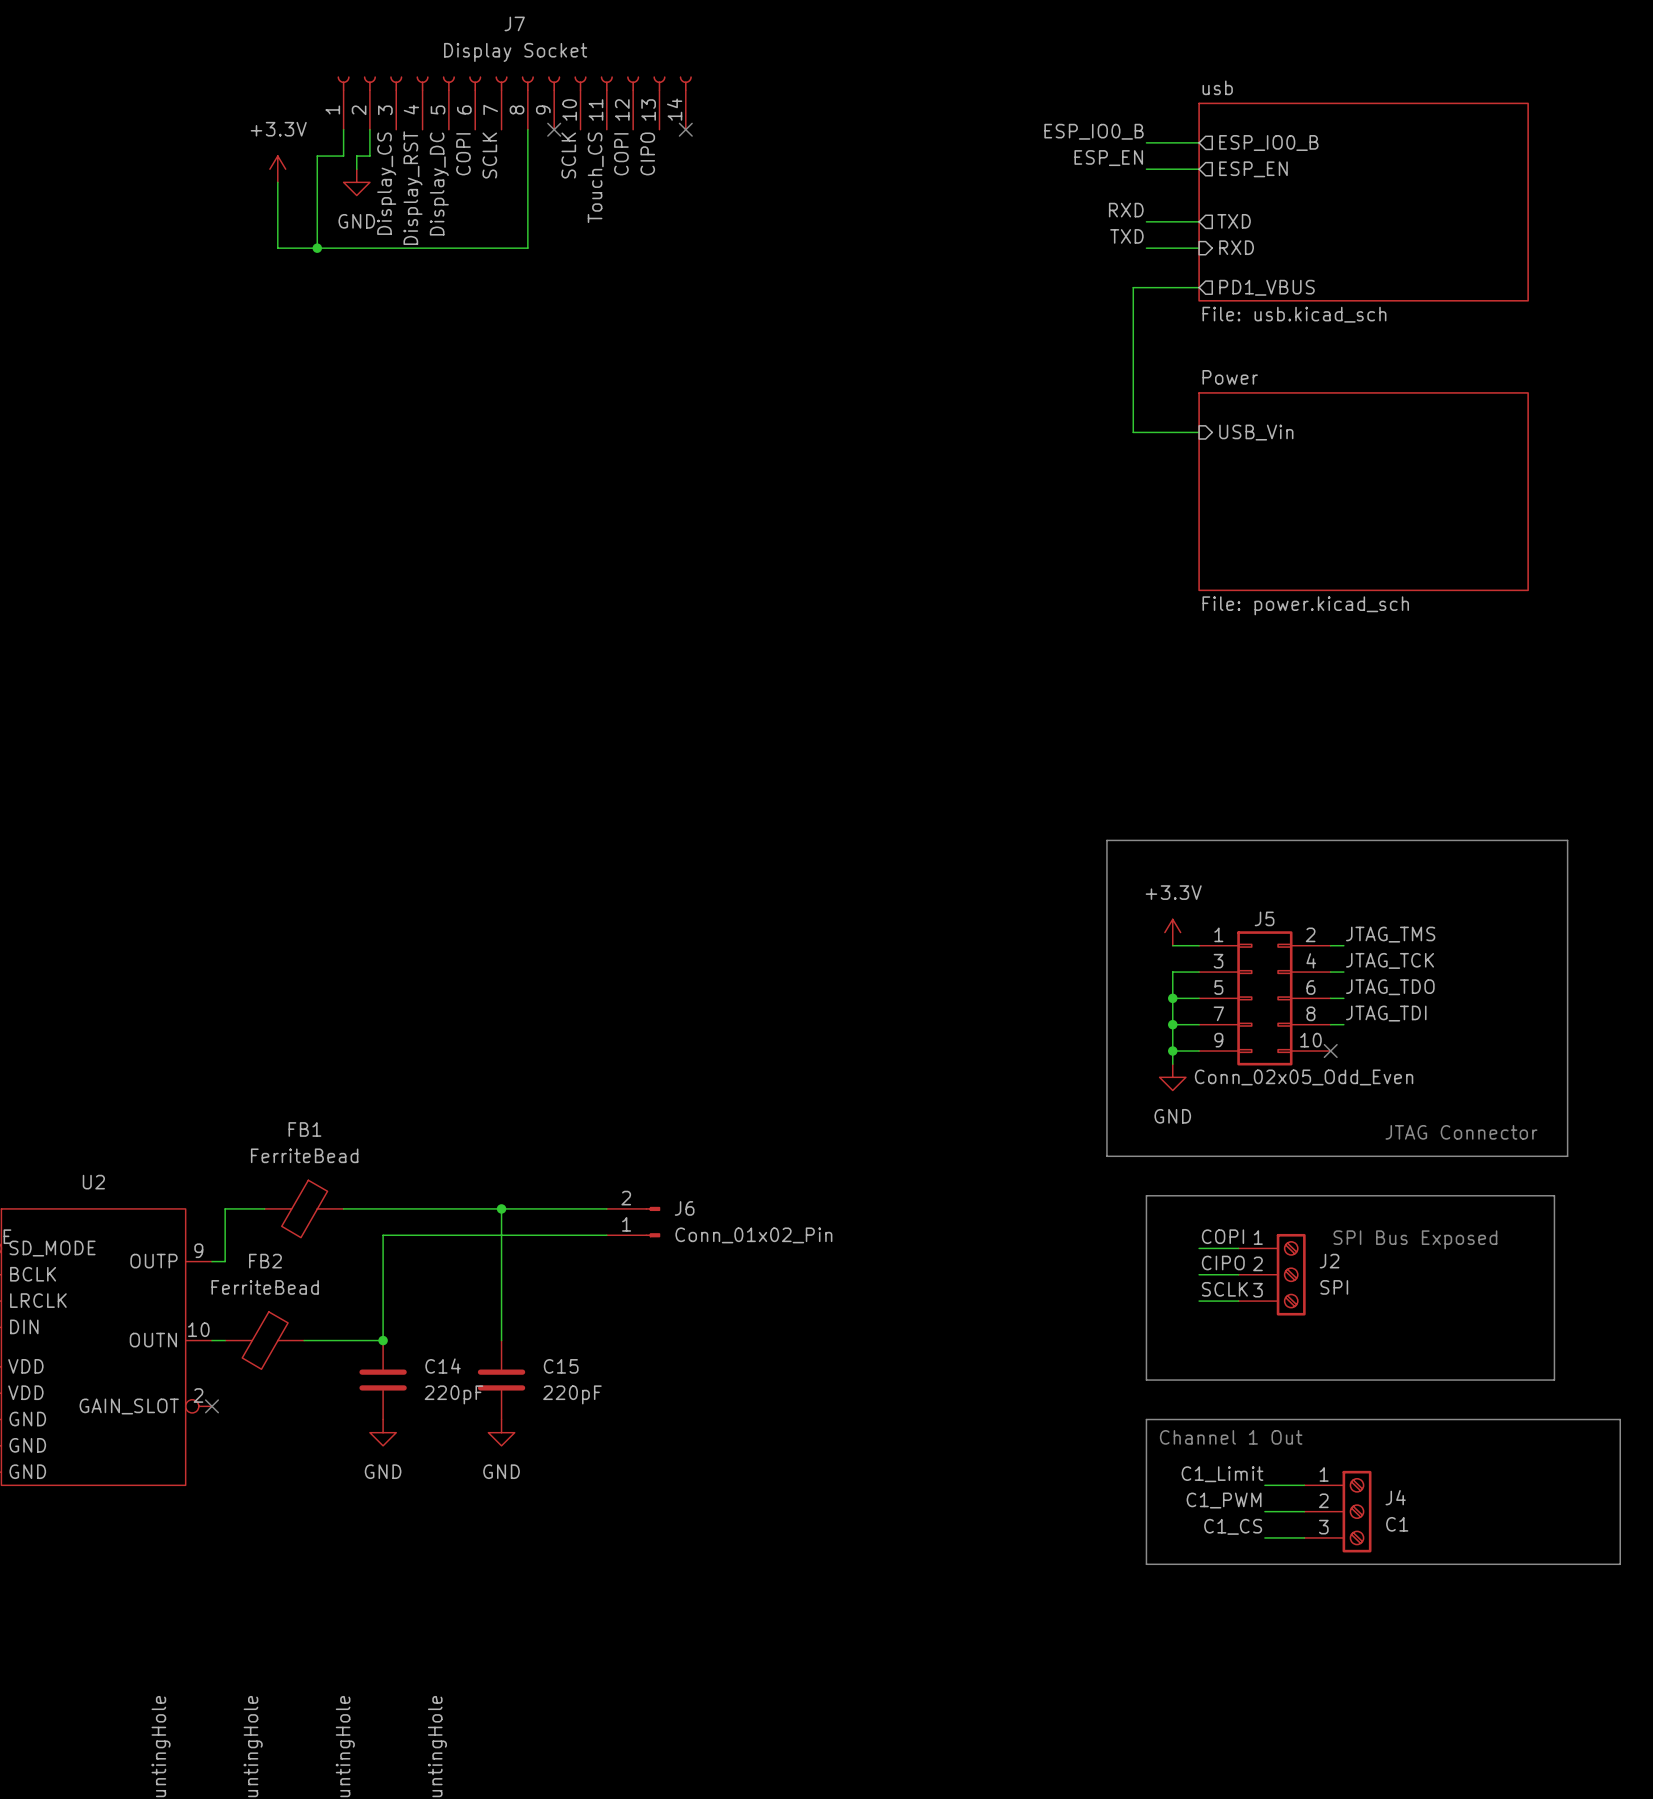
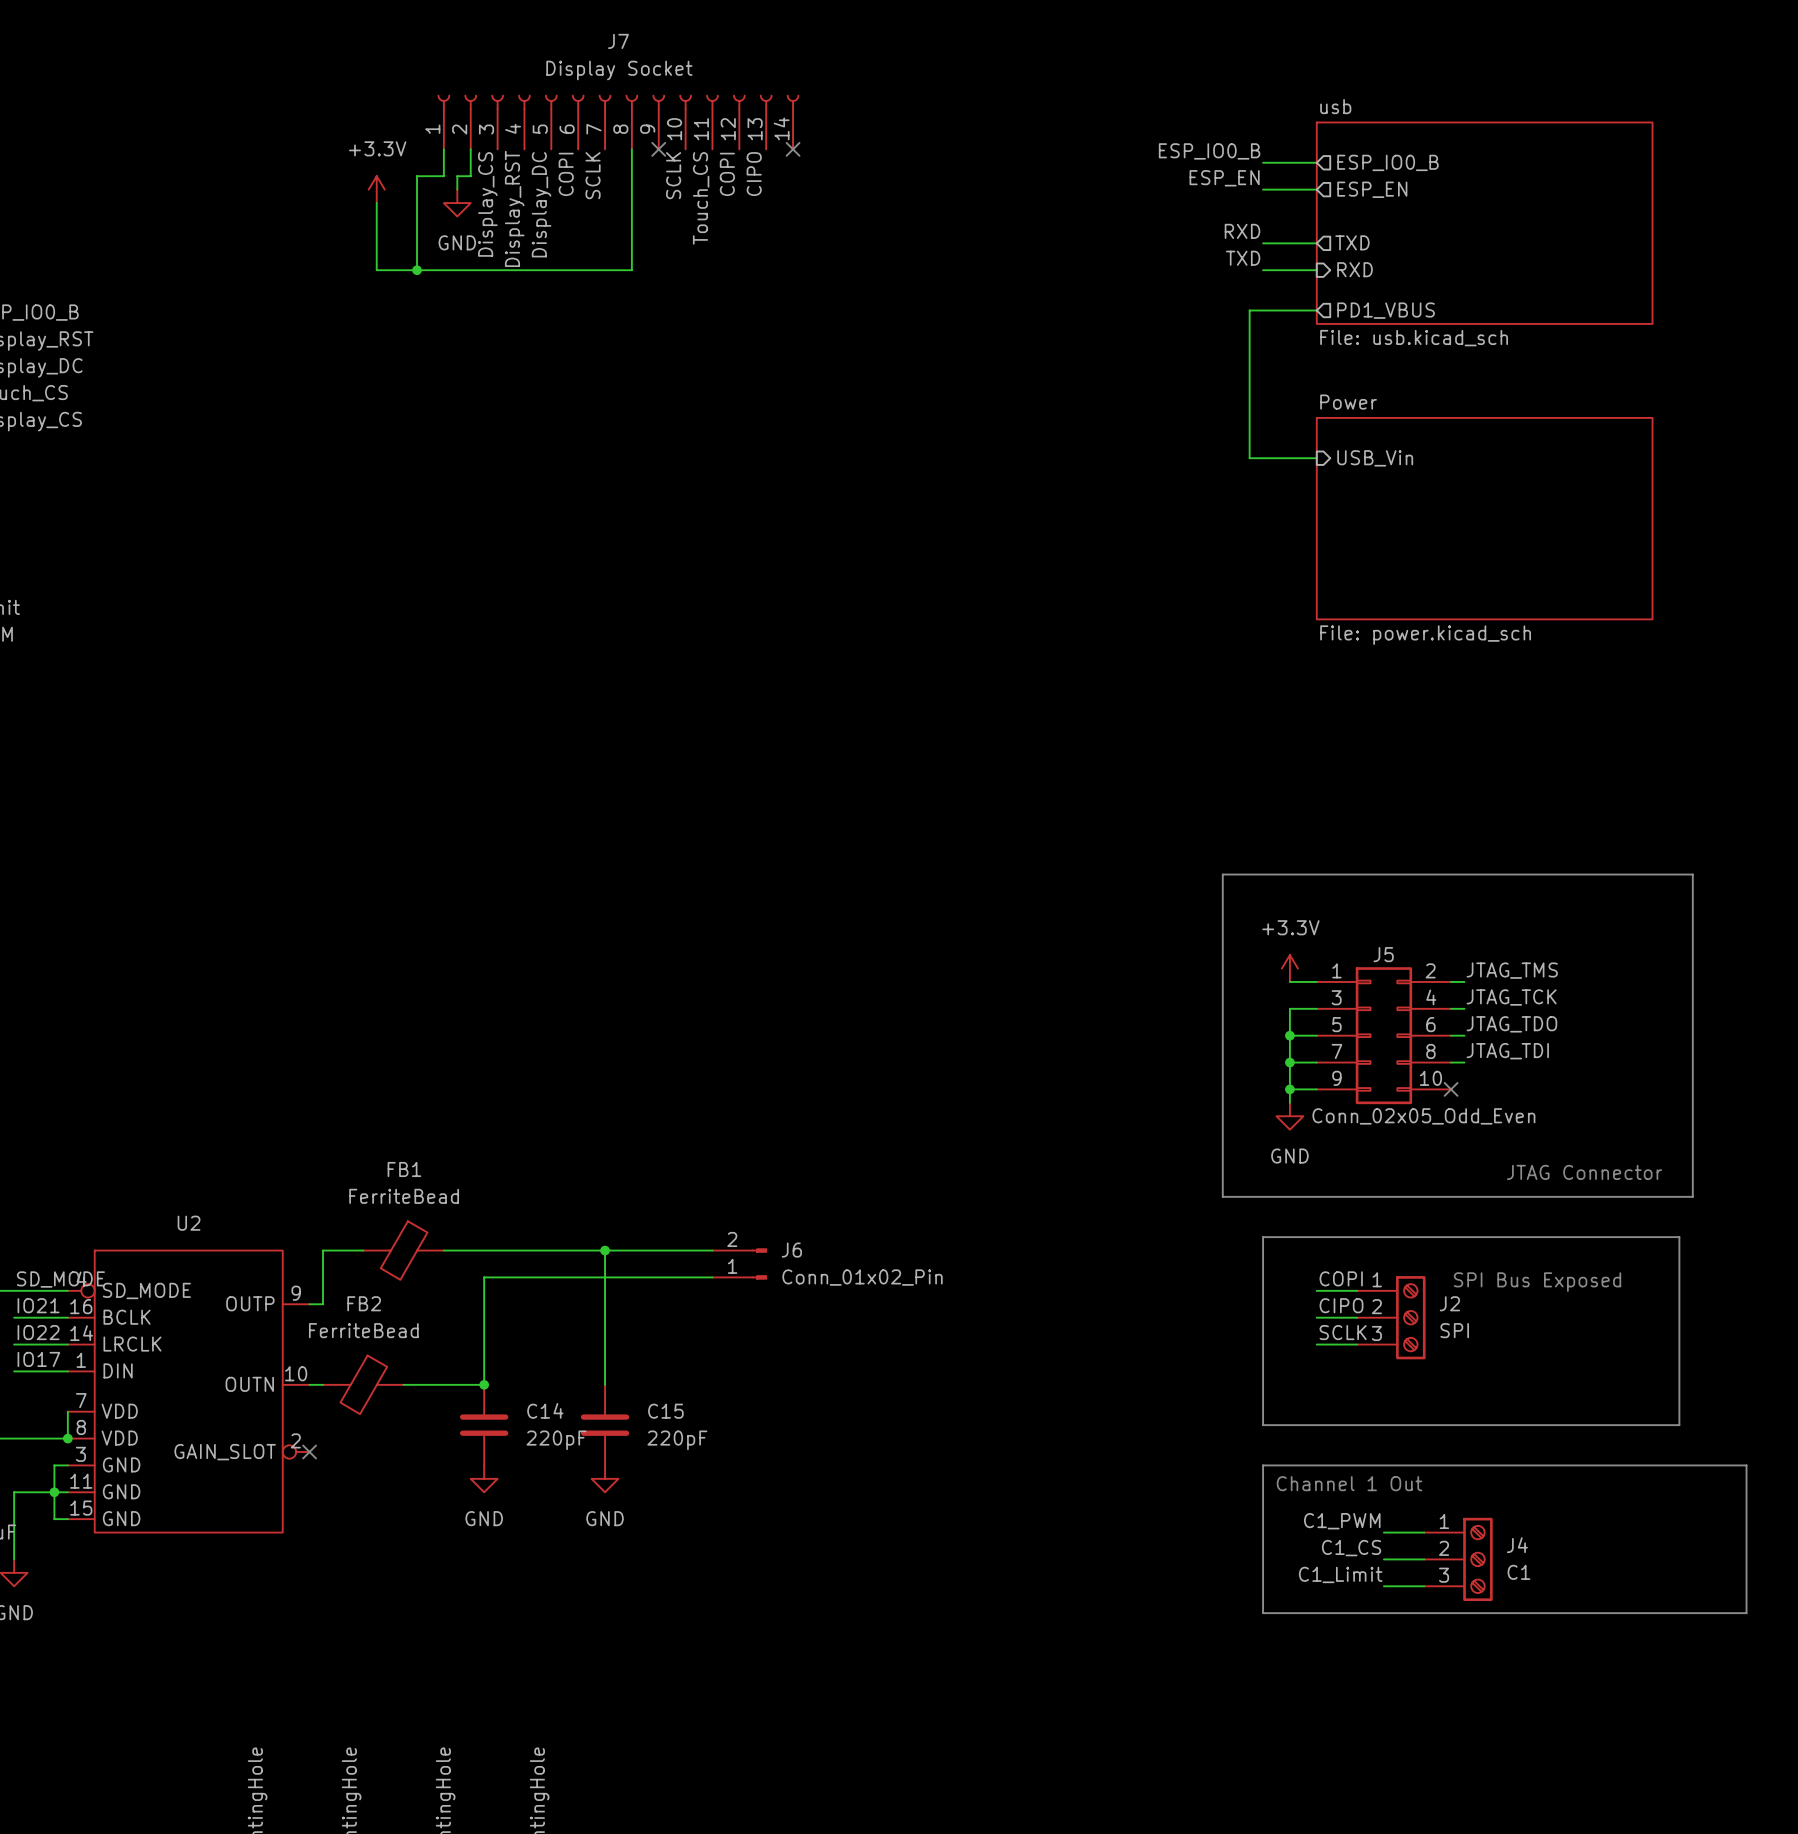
label: C1_Limit (1222, 1474) -> C1_PWM (1342, 1521)
label: C1_PWM (1224, 1500) -> C1_CS (1351, 1548)
label: C1_CS (1233, 1526) -> C1_Limit (1340, 1574)

